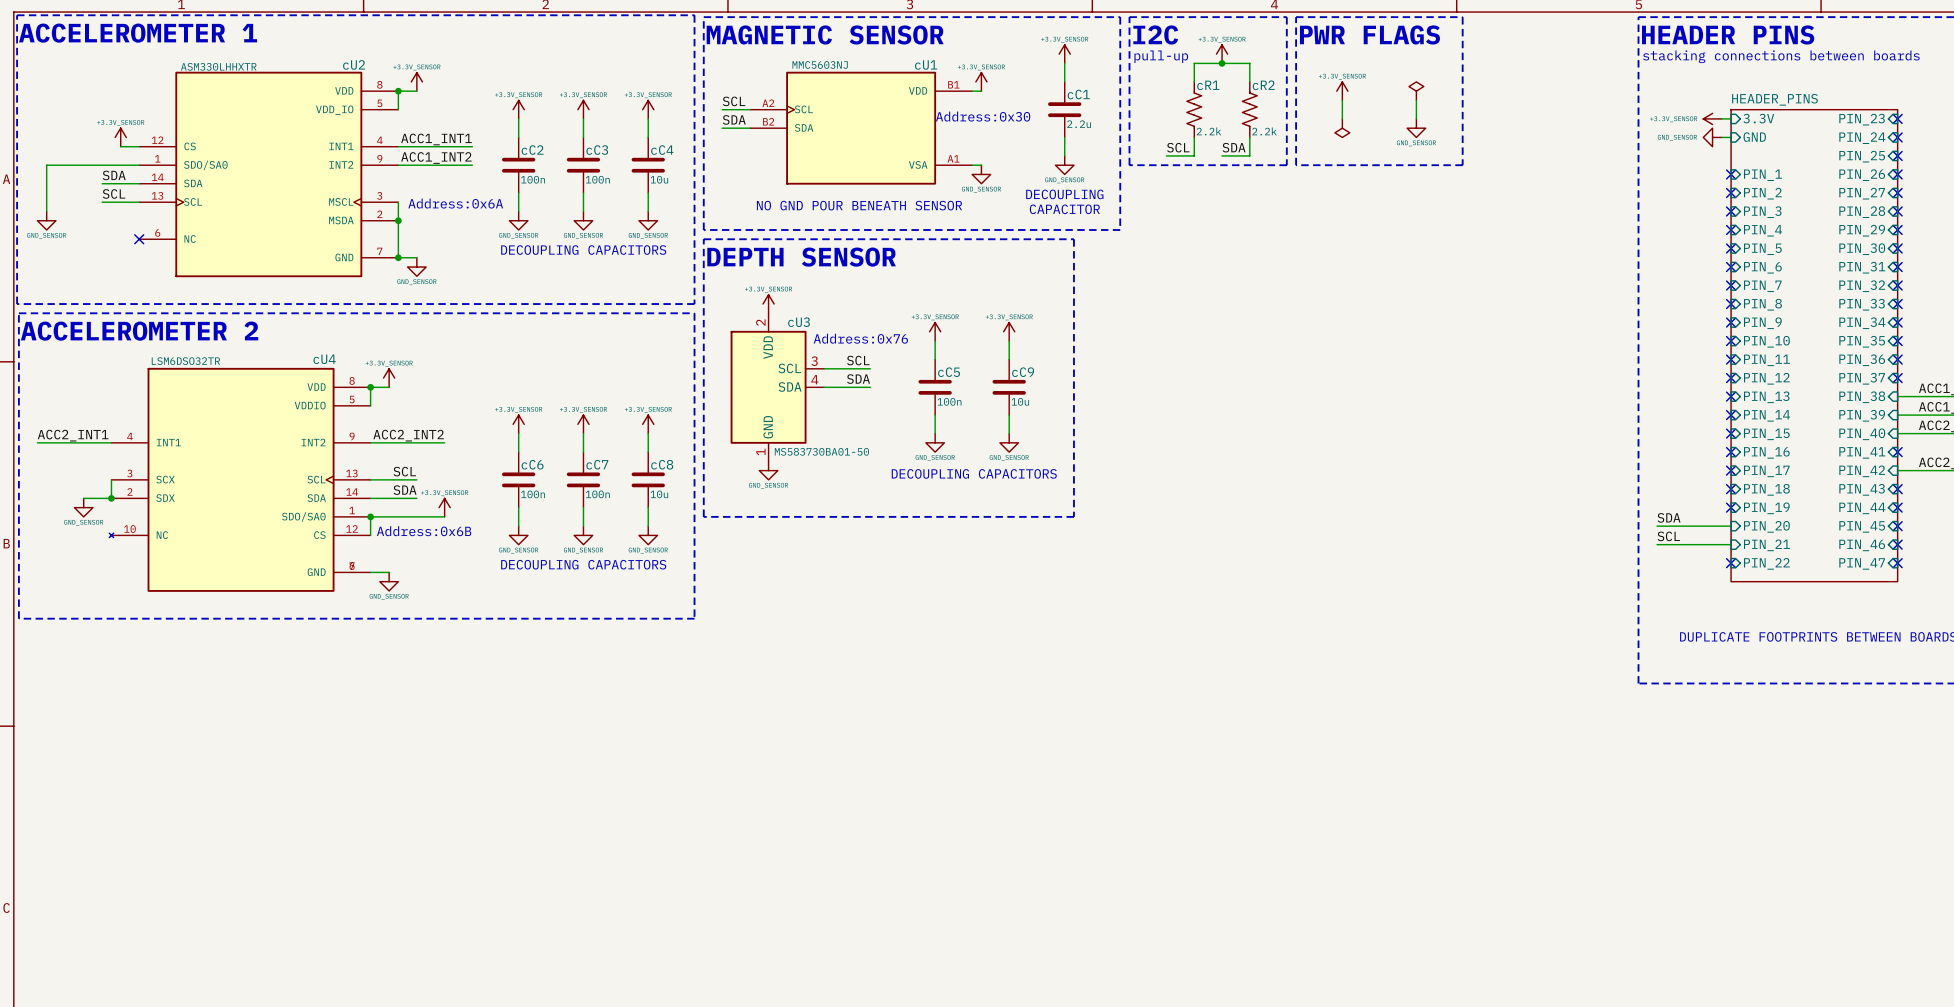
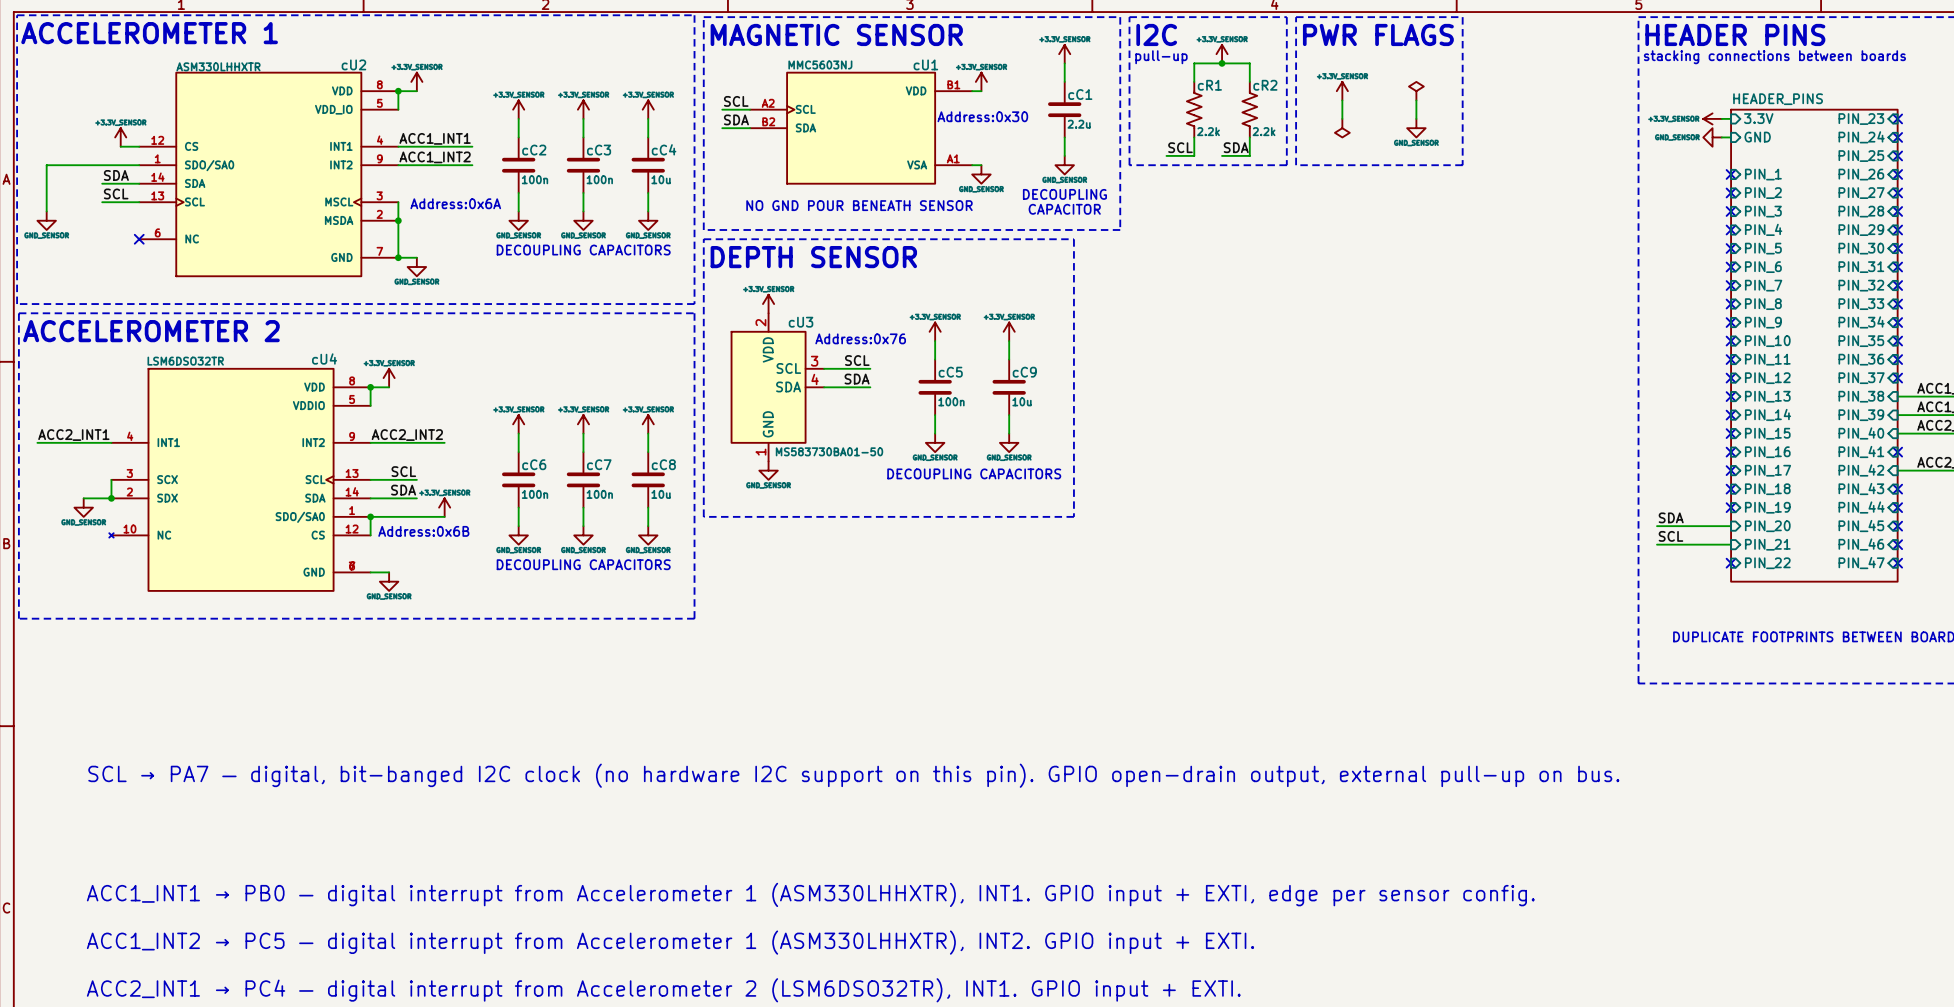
text: none -> SCL → PA7 — digital, bit-banged I2C clock (no hardware I2C support on this pin). GPIO open-drain output, external pull-up on bus. (853, 775)
text: none -> ACC1_INT1 → PB0 — digital interrupt from Accelerometer 1 (ASM330LHHXTR), INT1. GPIO input + EXTI, edge per sensor config. (810, 894)
text: none -> ACC1_INT2 → PC5 — digital interrupt from Accelerometer 1 (ASM330LHHXTR), INT2. GPIO input + EXTI. (670, 942)
text: none -> ACC2_INT1 → PC4 — digital interrupt from Accelerometer 2 (LSM6DSO32TR), INT1. GPIO input + EXTI. (663, 990)

